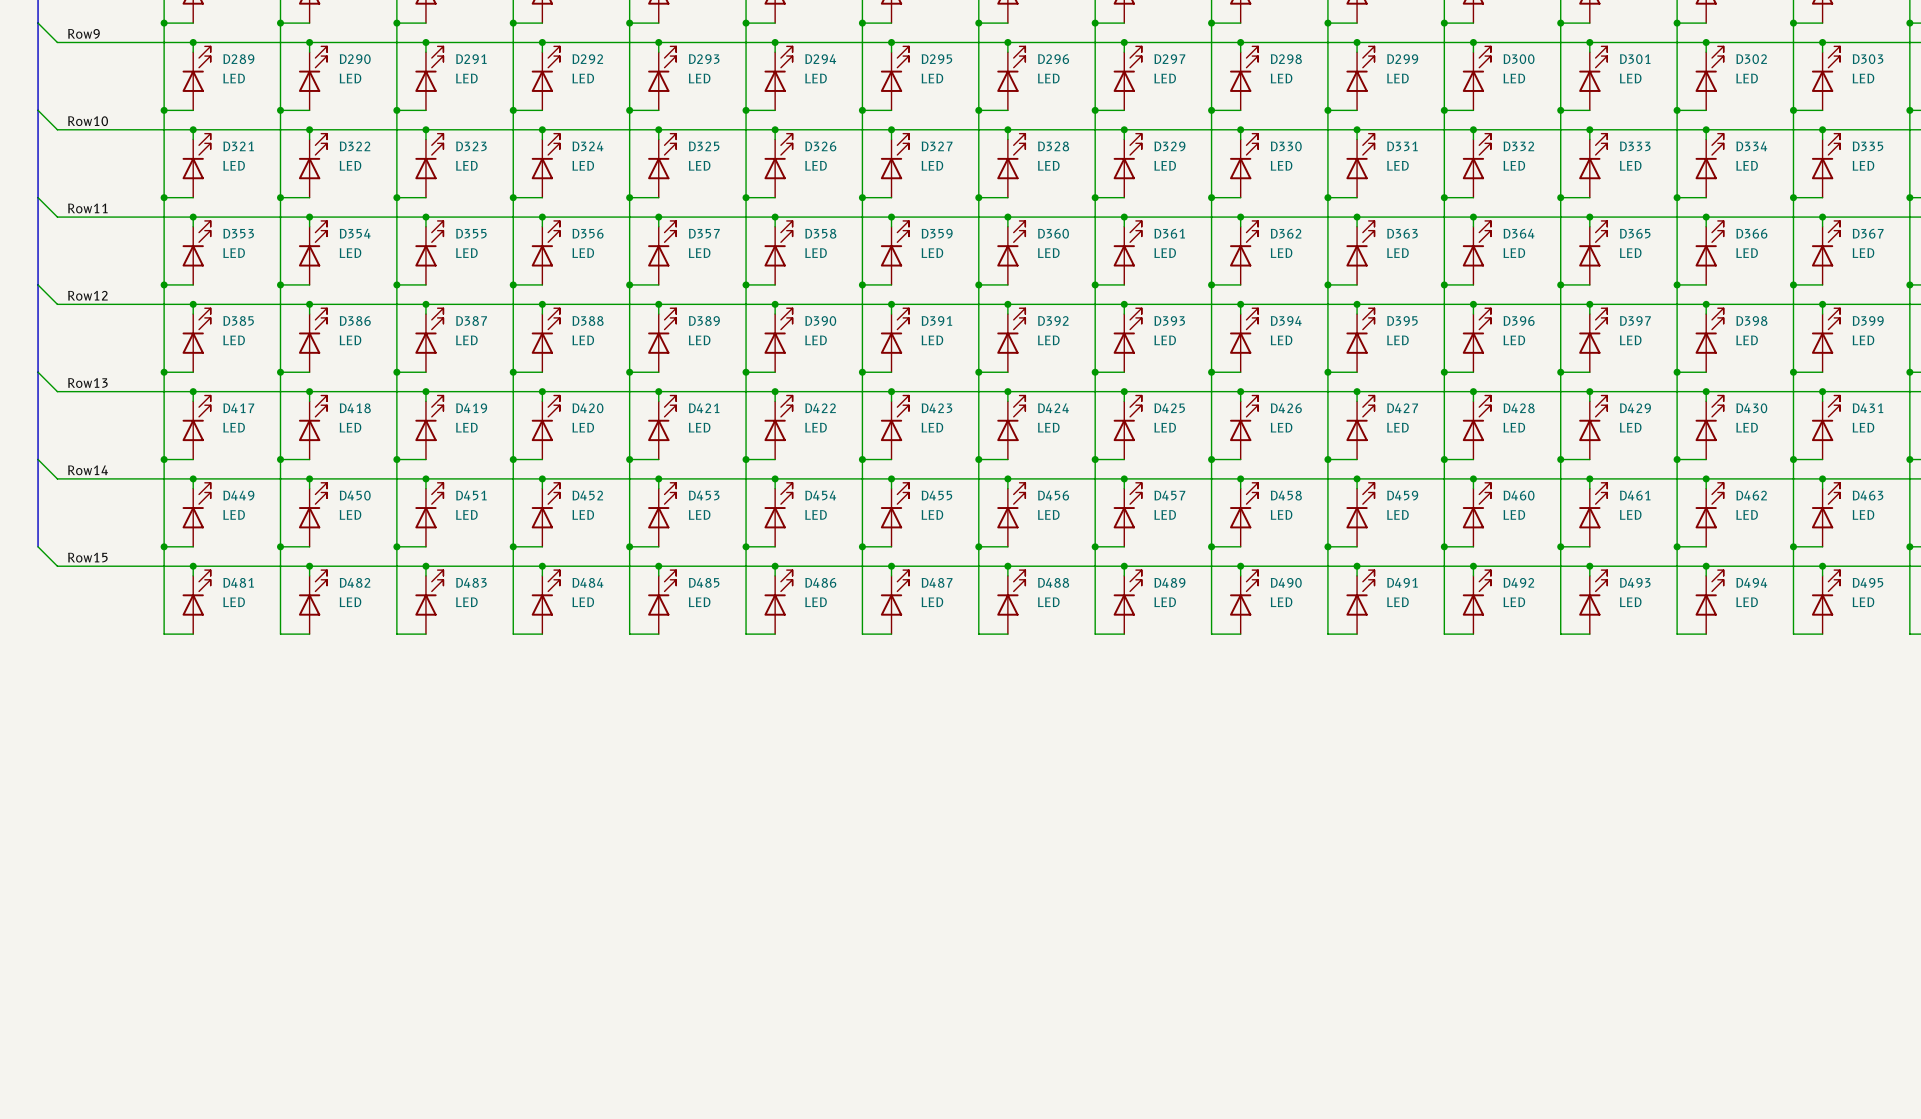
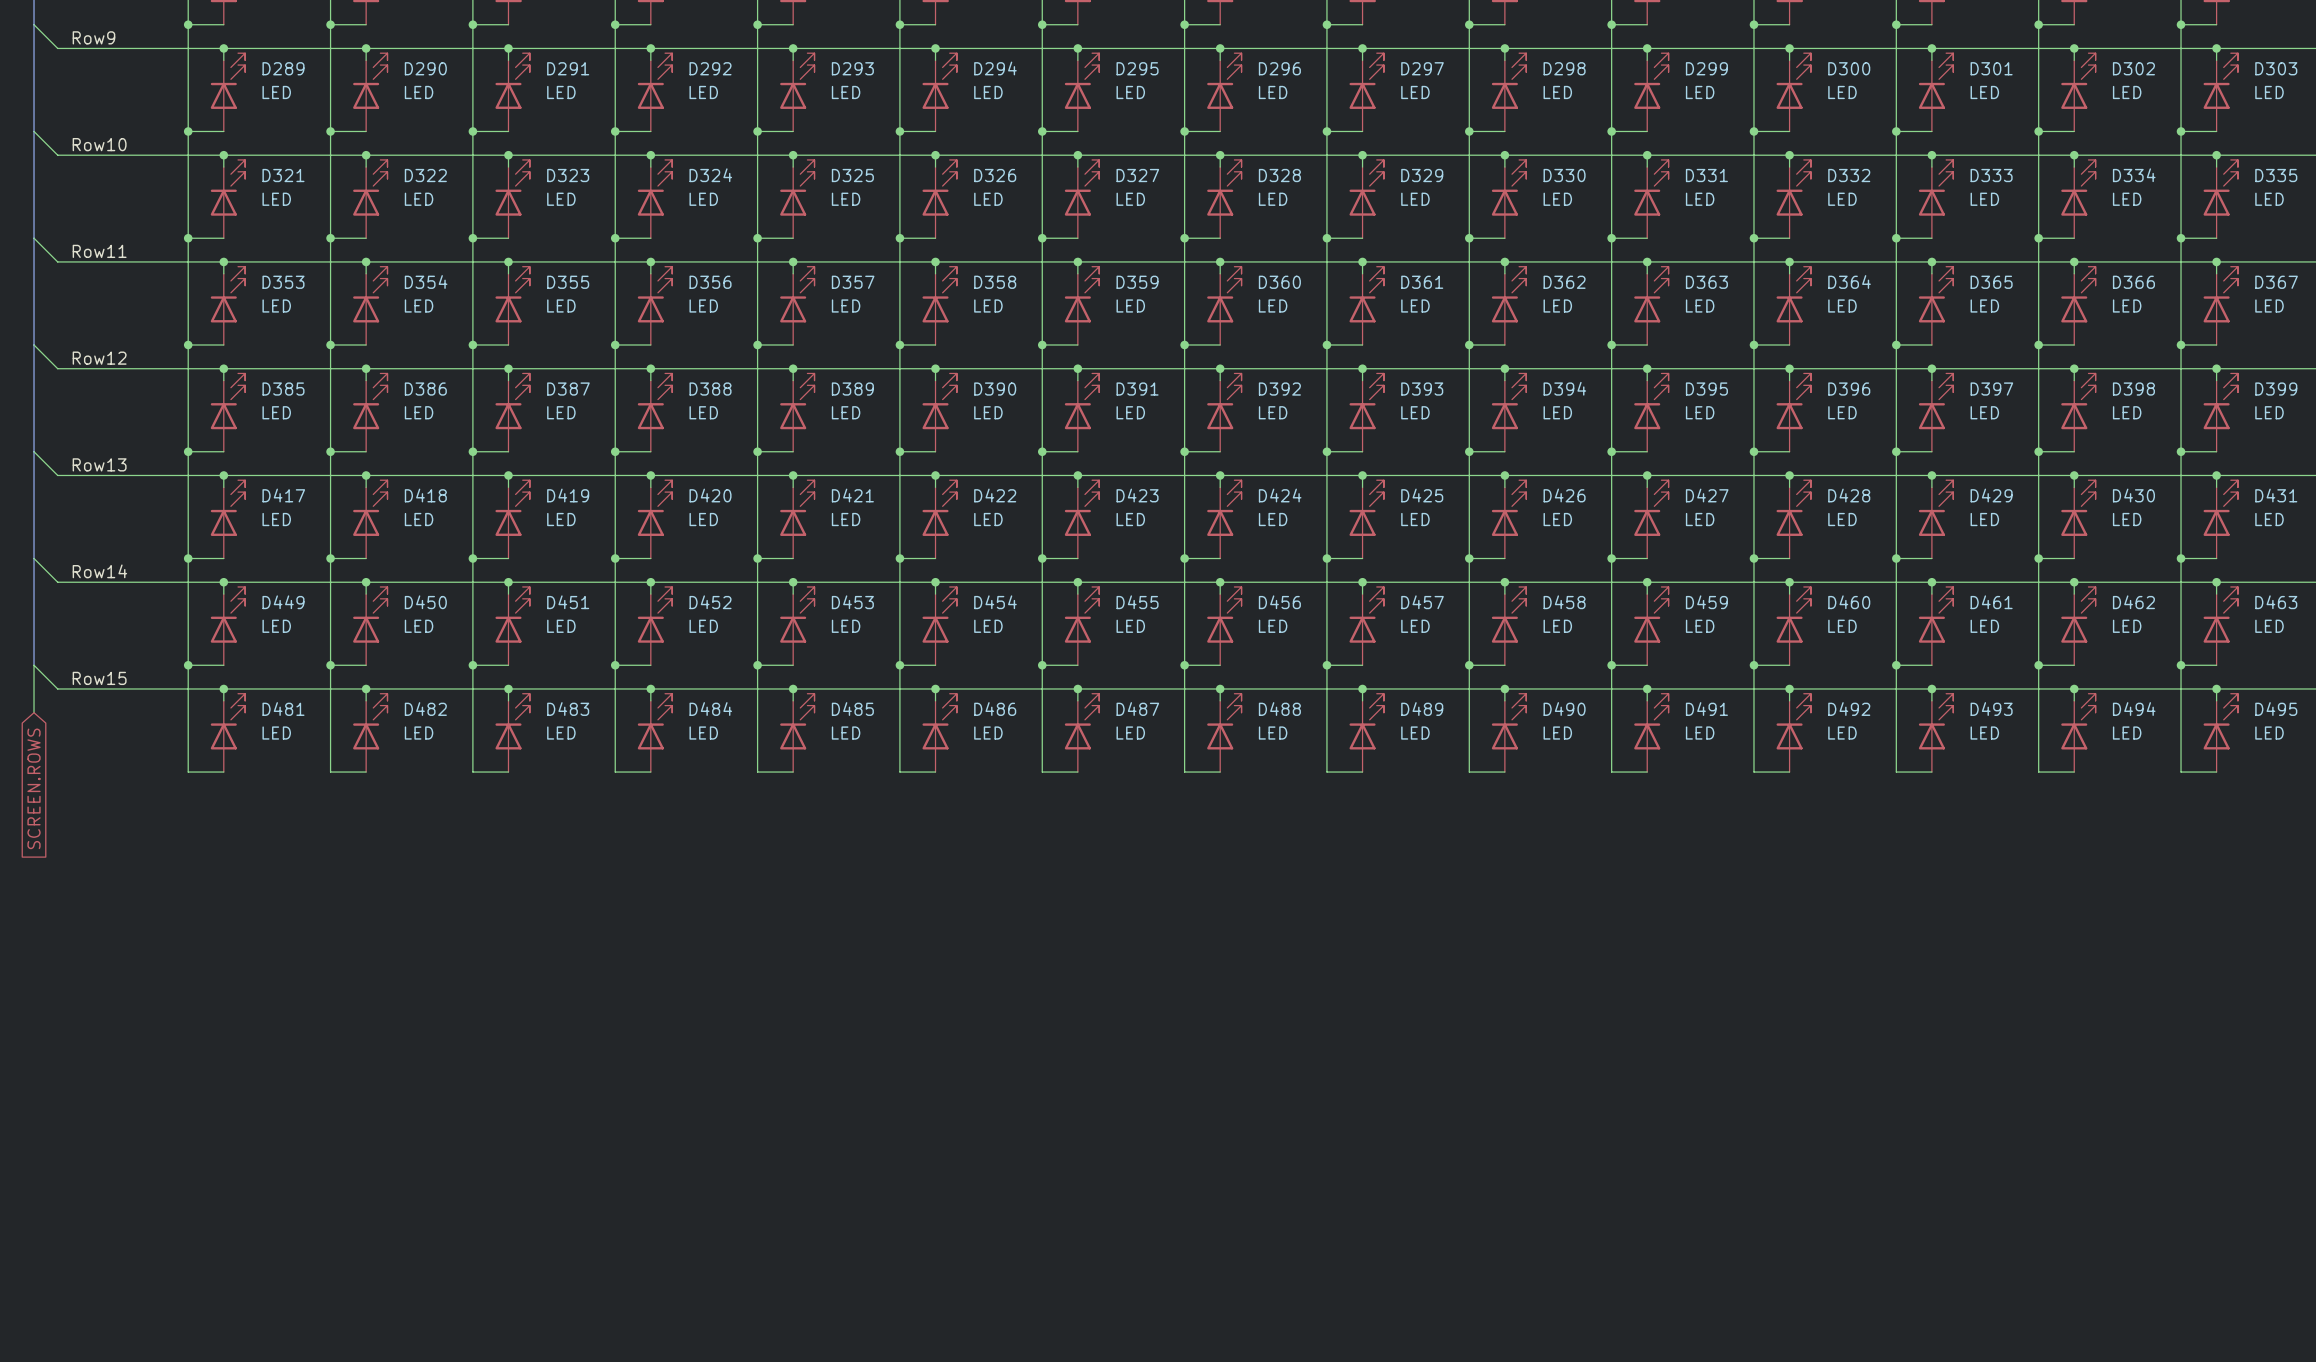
wire: none -> (34, 665) (34, 712)
global label: none -> SCREEN.ROWS (34, 788)

